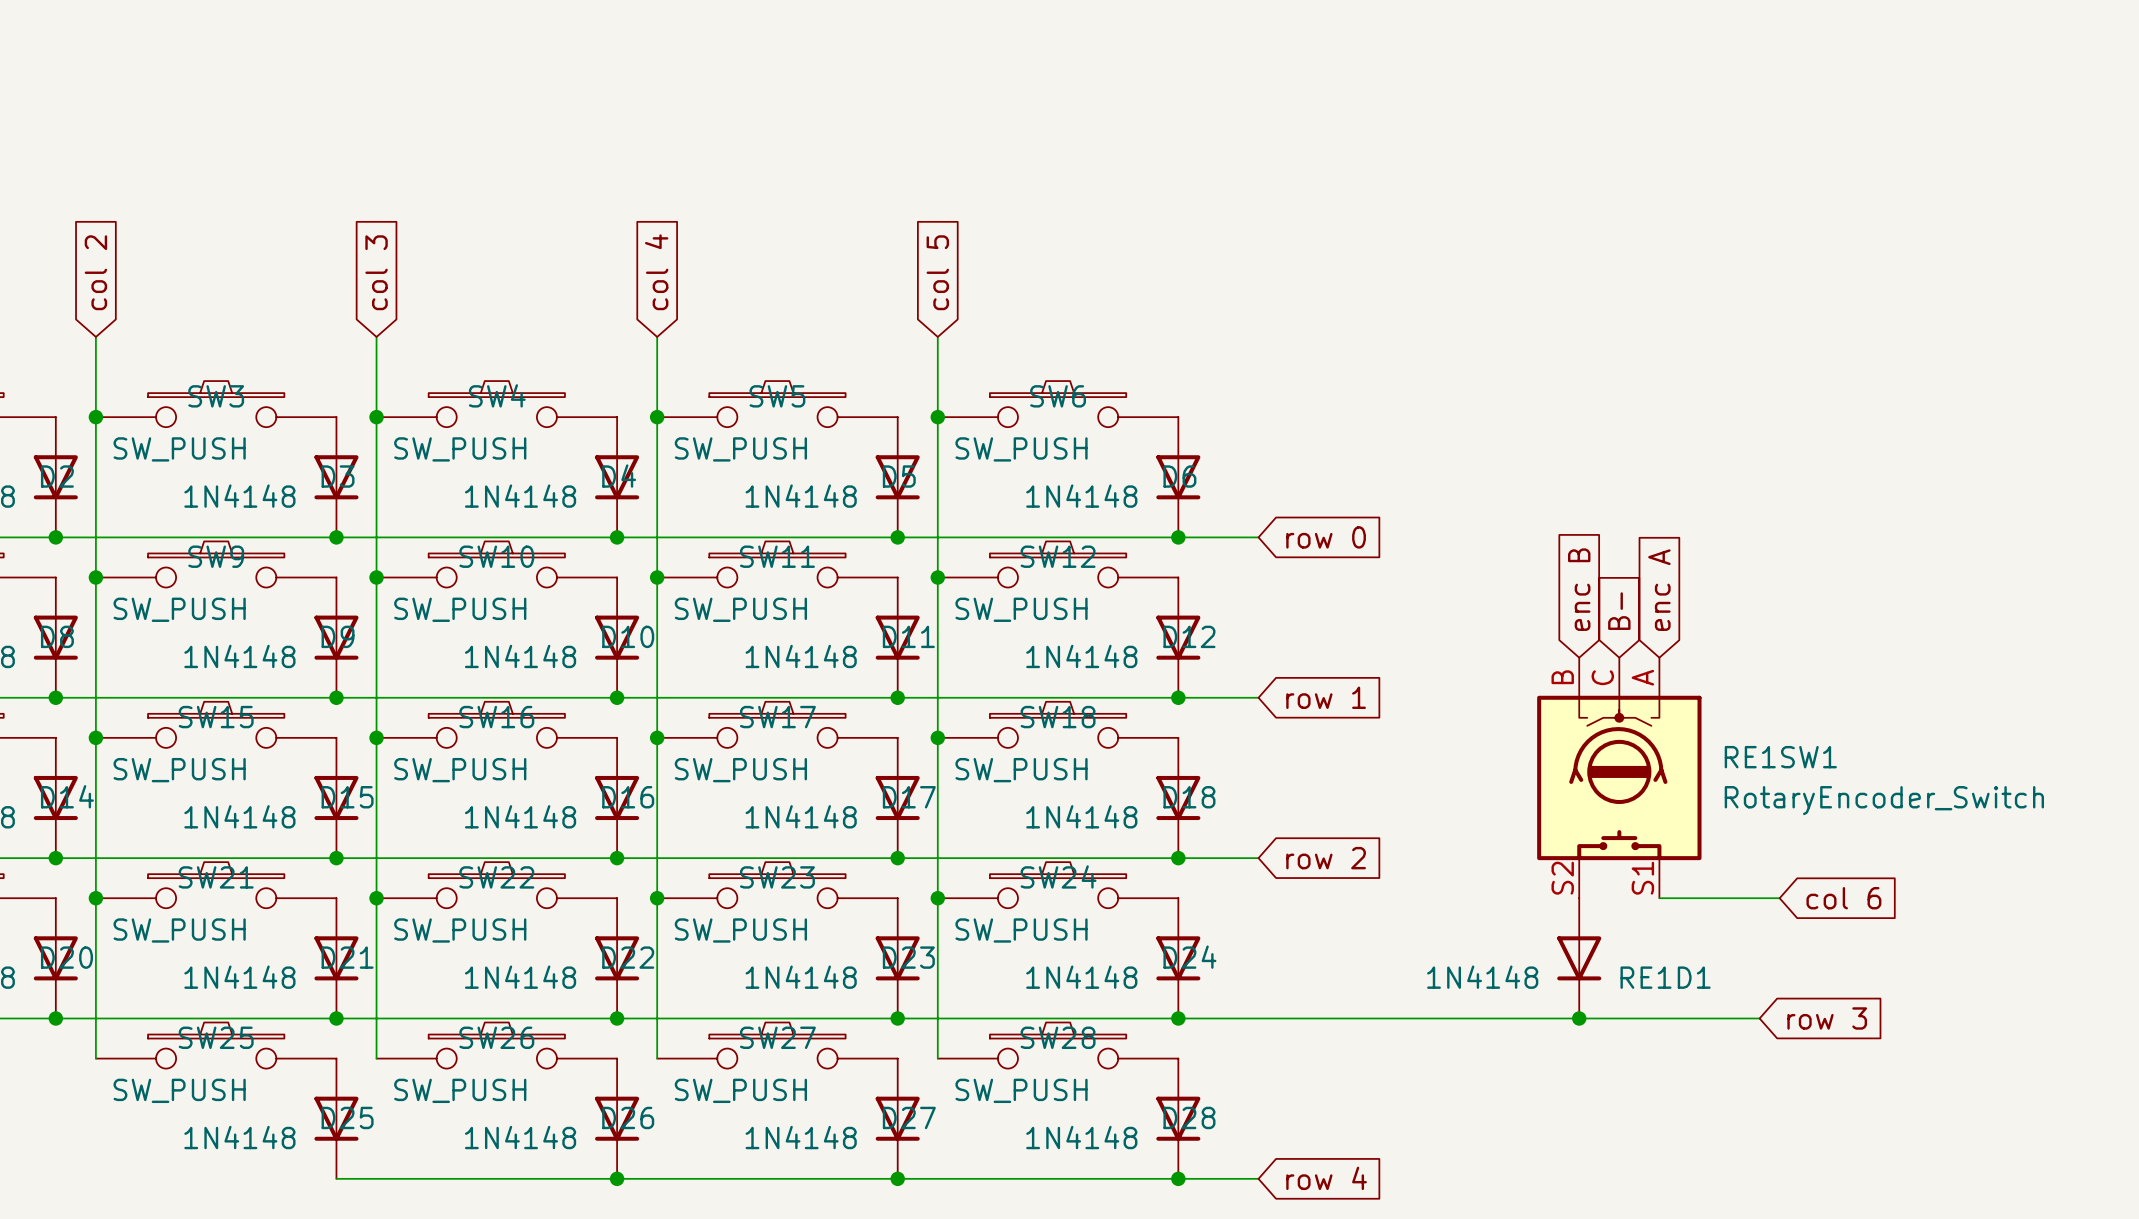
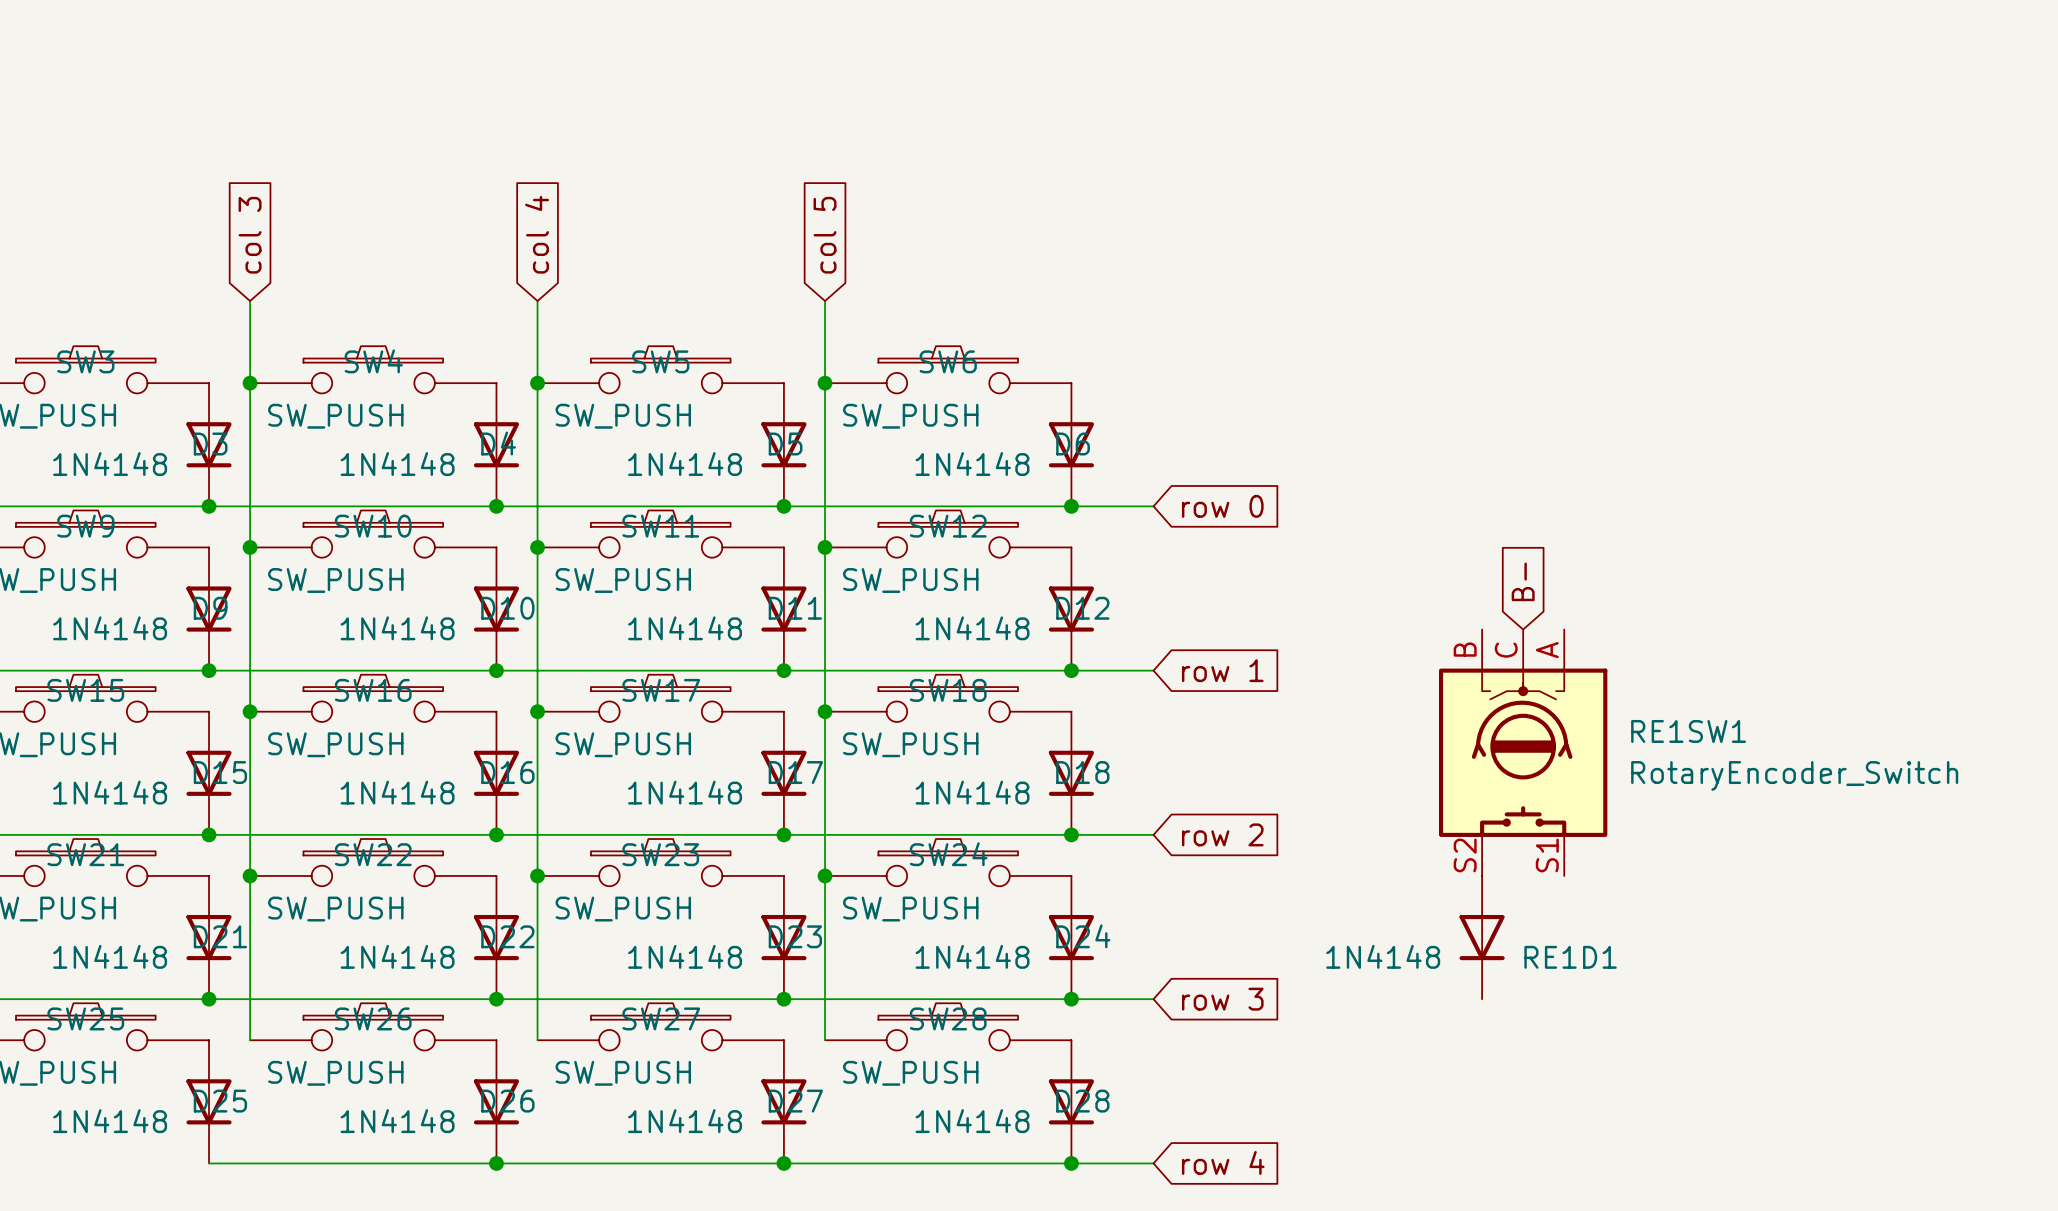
global label: enc B (1579, 589) -> none
global label: enc A (1659, 590) -> none
wire: (1659, 898) (1779, 898) -> none
global label: col 6 (1843, 898) -> none
wire: (1258, 1018) (1759, 1018) -> none
global label: none -> row 3 (1222, 999)
junction: (1579, 1018) -> none
global label: row 3 (1827, 1018) -> none

